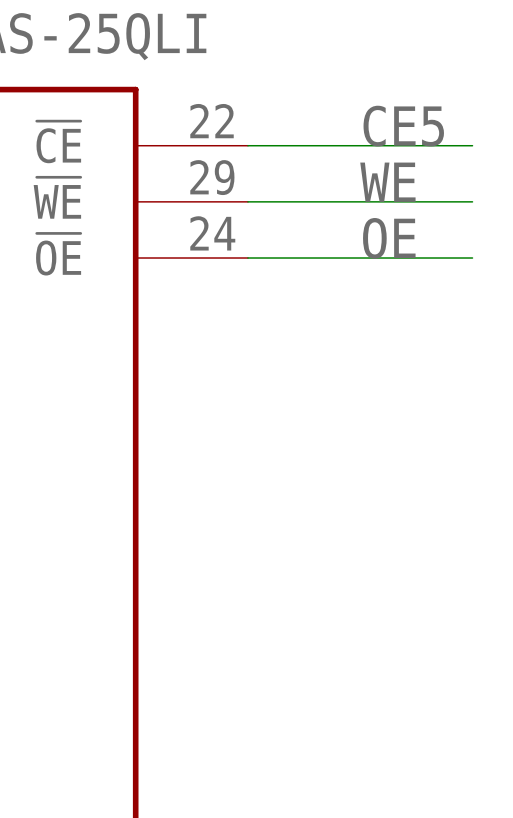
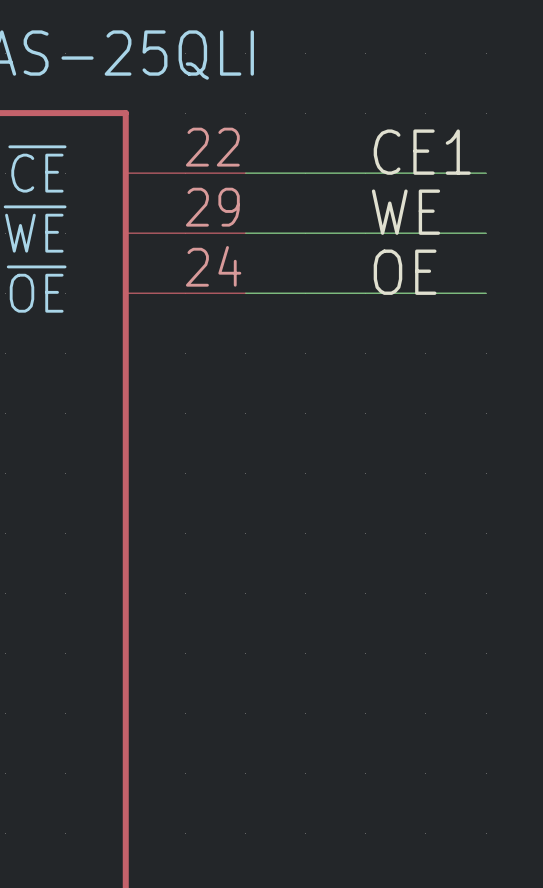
label: CE5 (403, 126) -> CE1 (422, 152)

